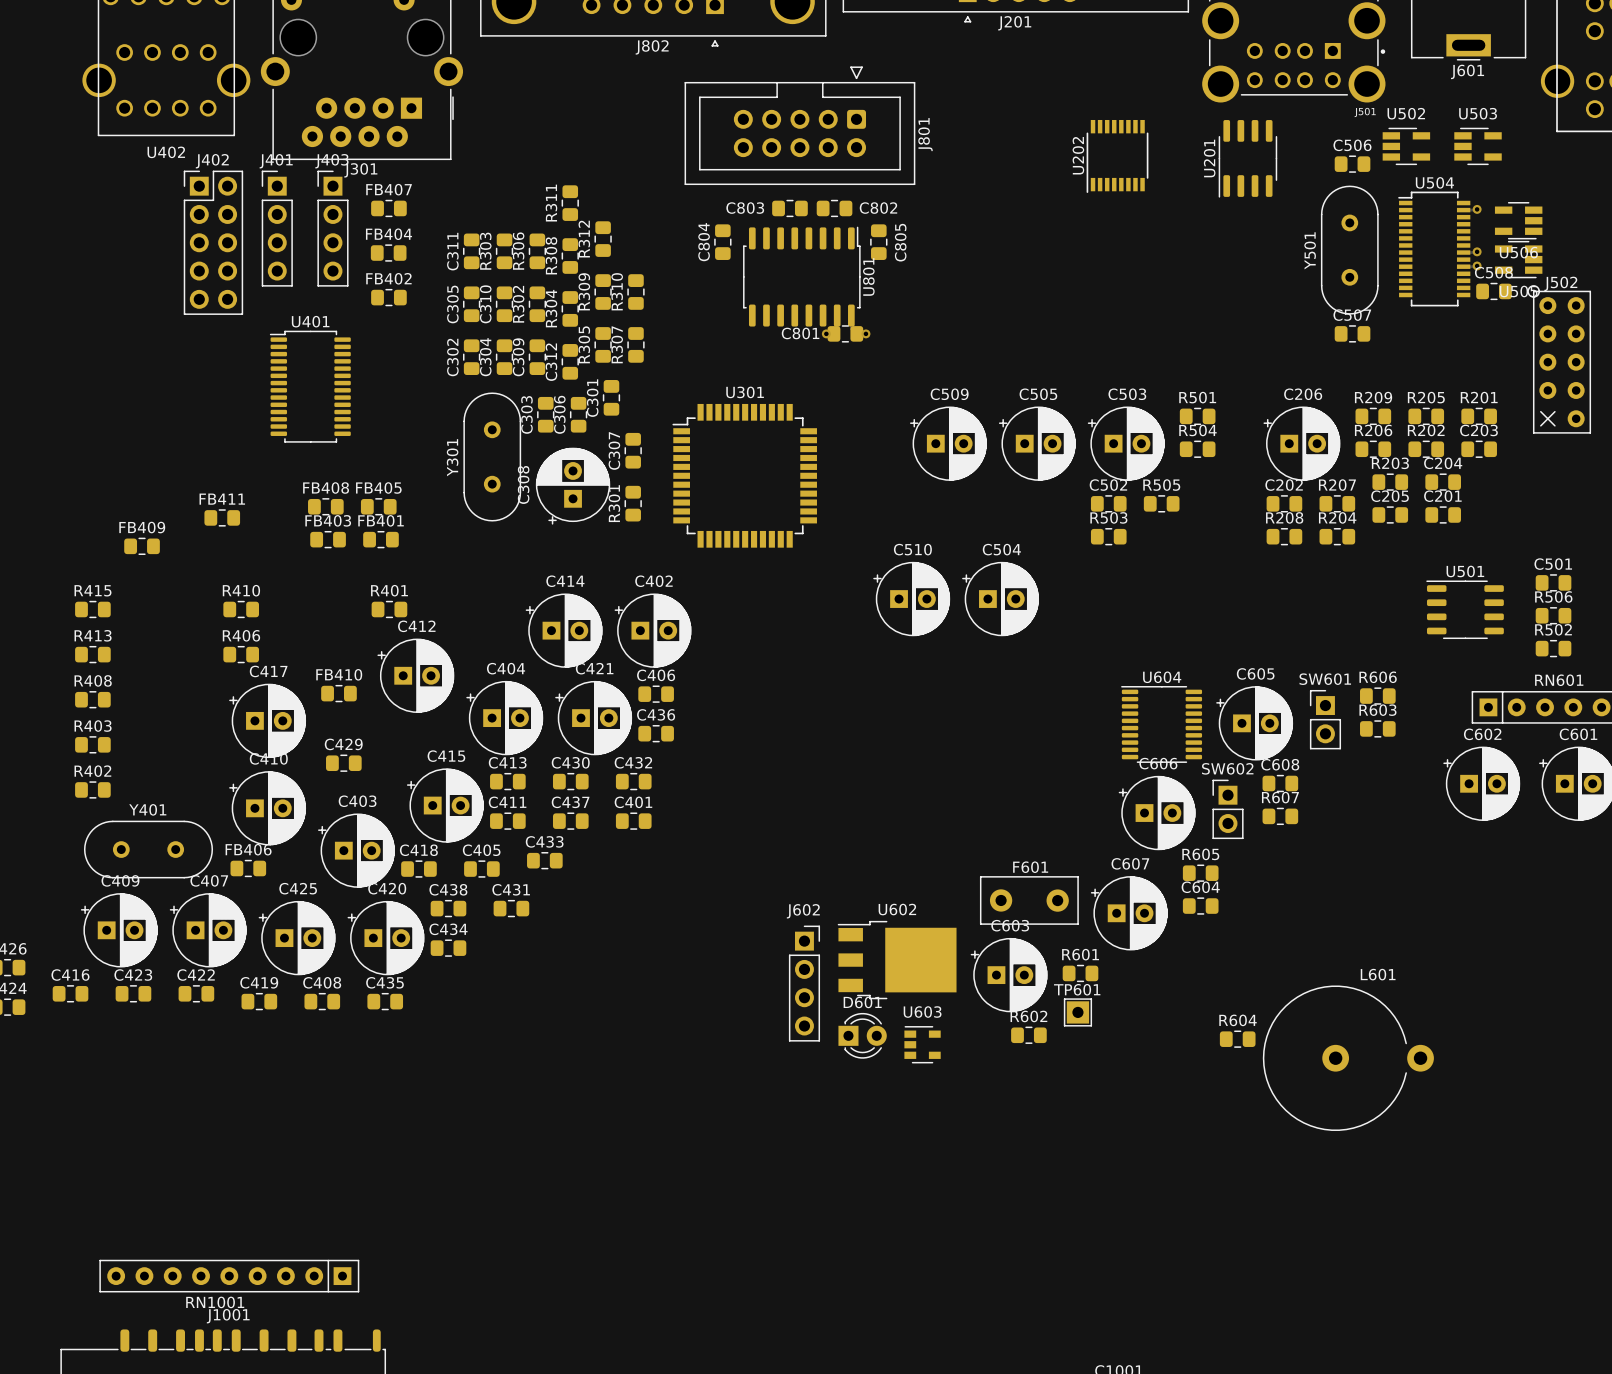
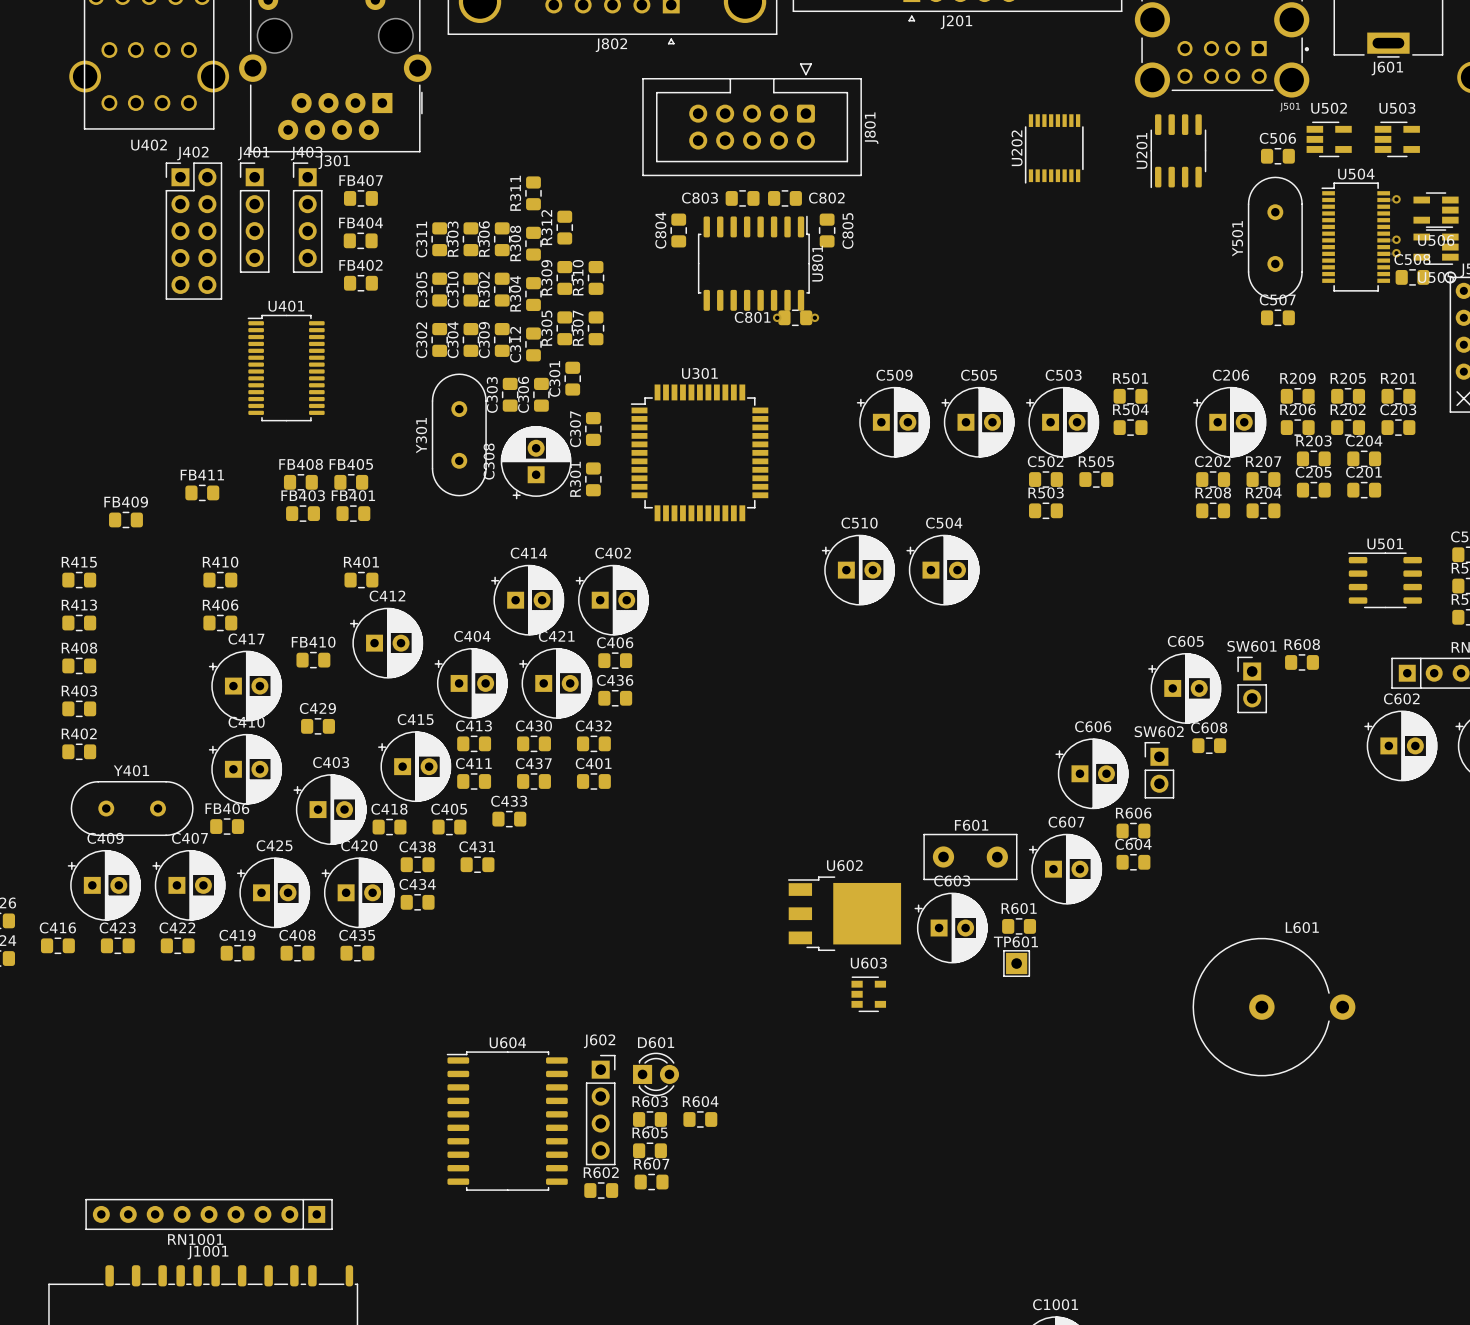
U604 name position: U604 (1162, 677) -> U604 (507, 1042)
R606 name: R606 (1378, 677) -> R608 (1302, 644)
U604 footprint: [1121, 686, 1203, 763] -> [446, 1051, 568, 1191]
R603 position: (1377, 728) -> (649, 1119)
R607 position: (1280, 816) -> (651, 1182)
R605 name: R605 (1200, 854) -> R606 (1133, 813)
J602 position: (804, 983) -> (600, 1110)
D601 position: (862, 1035) -> (656, 1074)
R602 position: (1028, 1035) -> (601, 1190)
R604 position: (1237, 1039) -> (700, 1119)
R605: none -> (649, 1150)

